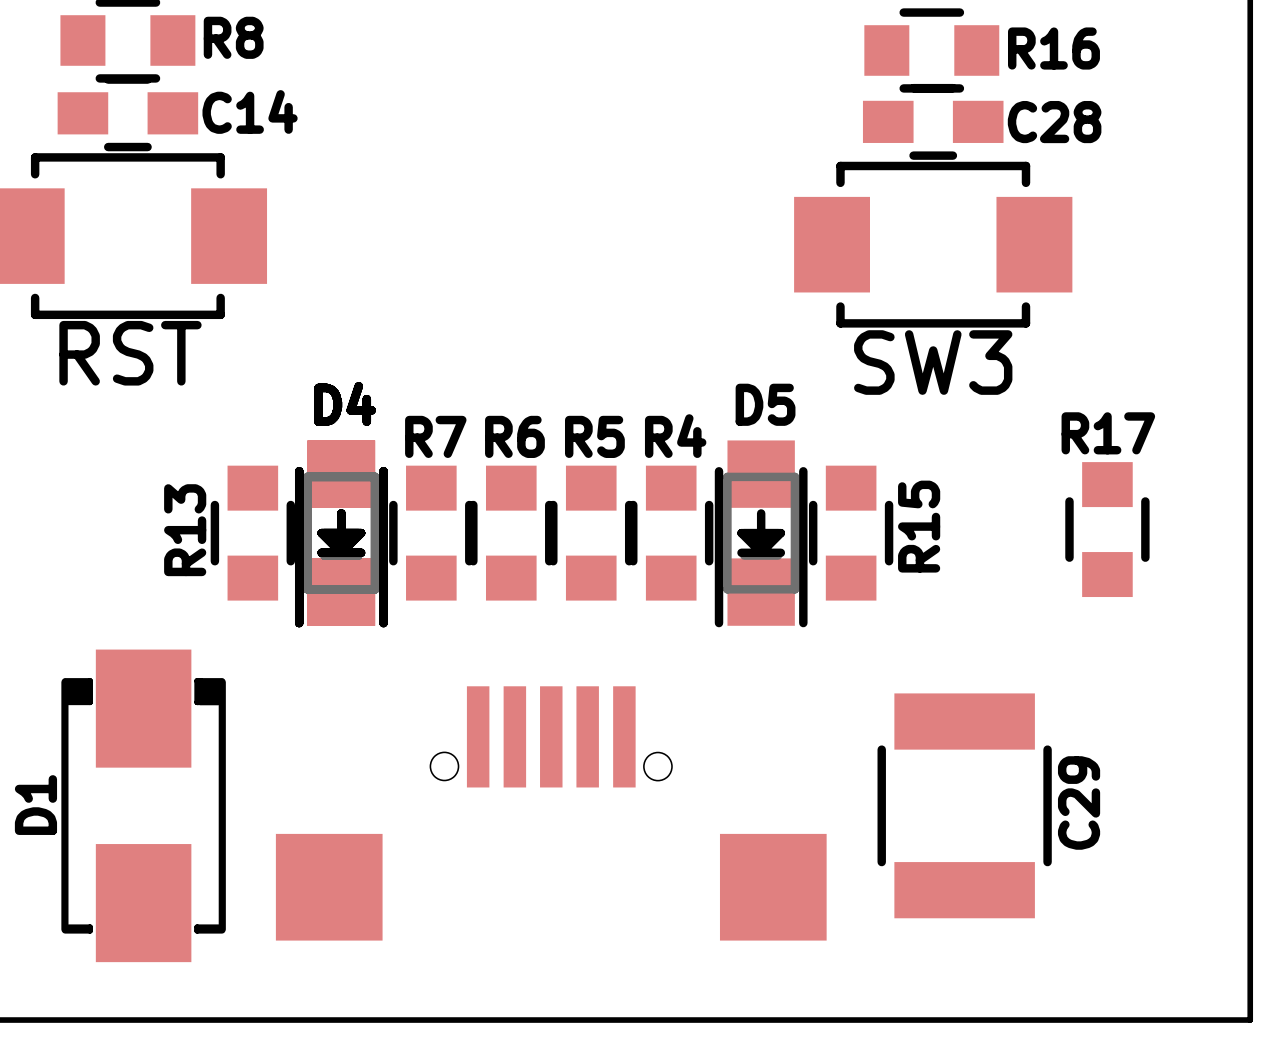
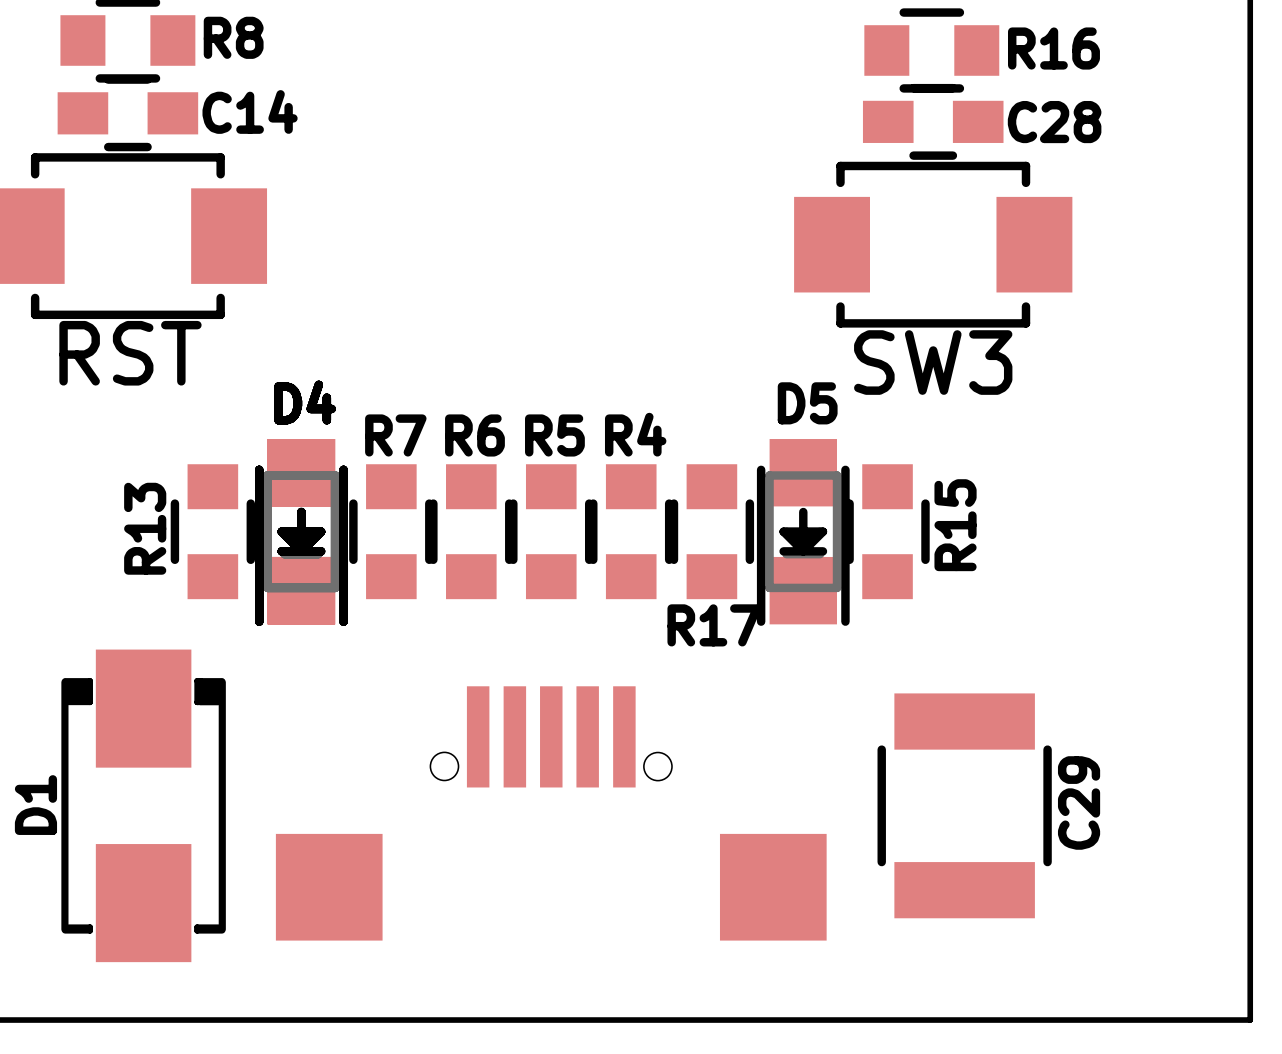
R17 name position: R17 (1108, 433) -> R17 (714, 625)
R17 position: (1107, 529) -> (711, 531)
R13 position: (252, 533) -> (212, 531)
D4 position: (341, 533) -> (301, 532)
R7 position: (431, 533) -> (391, 531)
R6 position: (511, 533) -> (471, 531)
R5 position: (591, 533) -> (551, 531)
R4 position: (671, 533) -> (631, 531)
D5 position: (761, 533) -> (803, 532)
R15 position: (851, 533) -> (887, 531)

